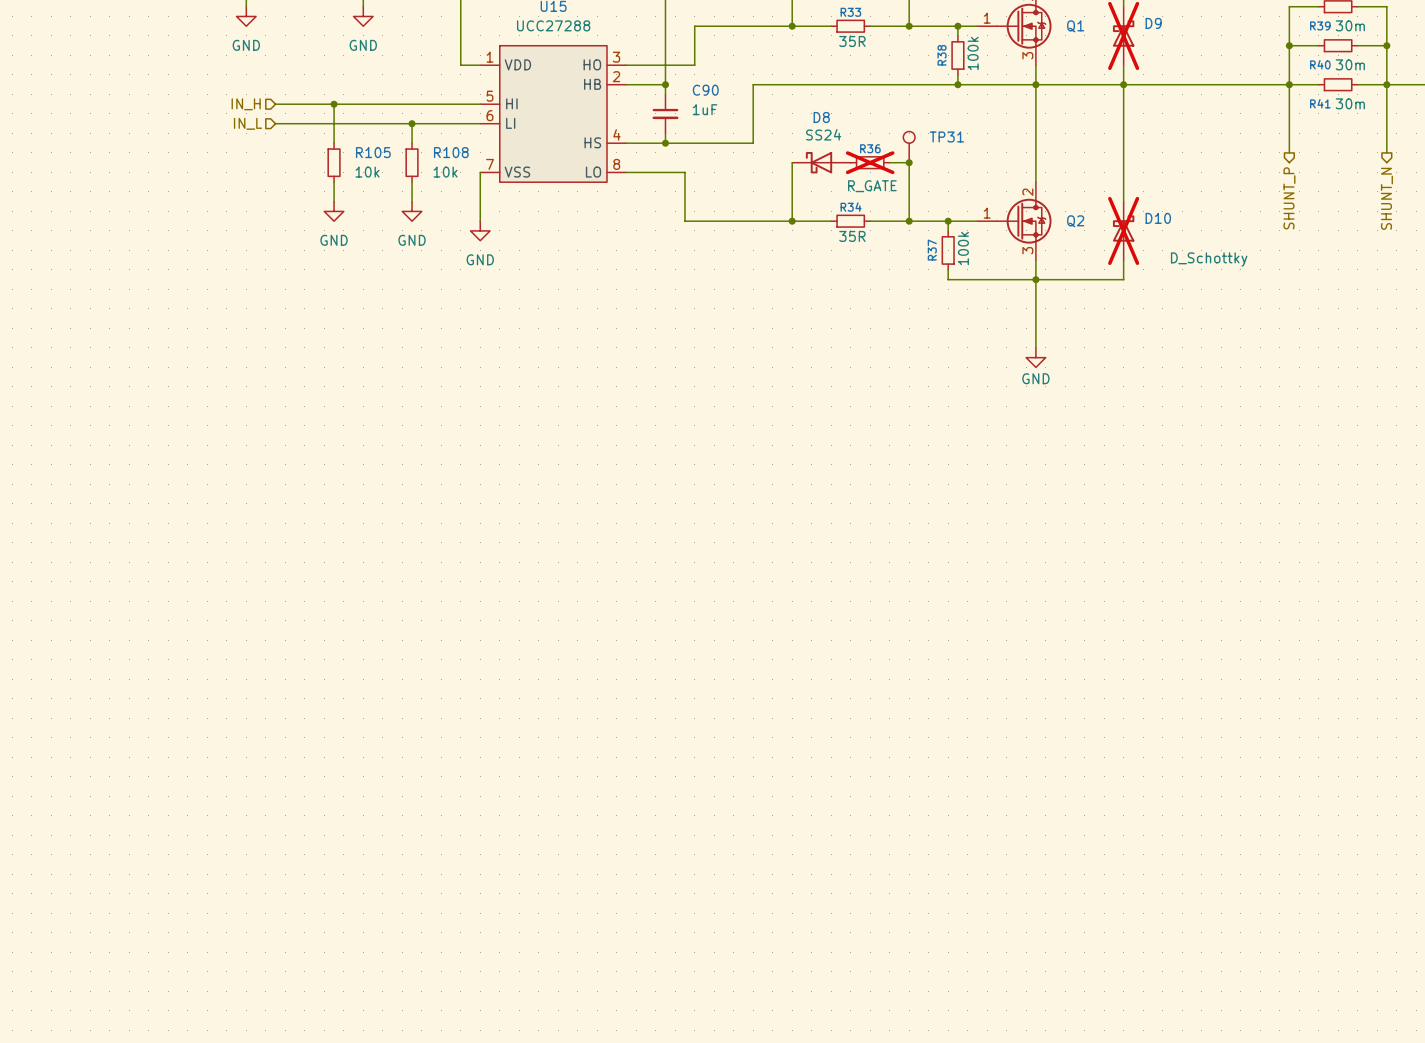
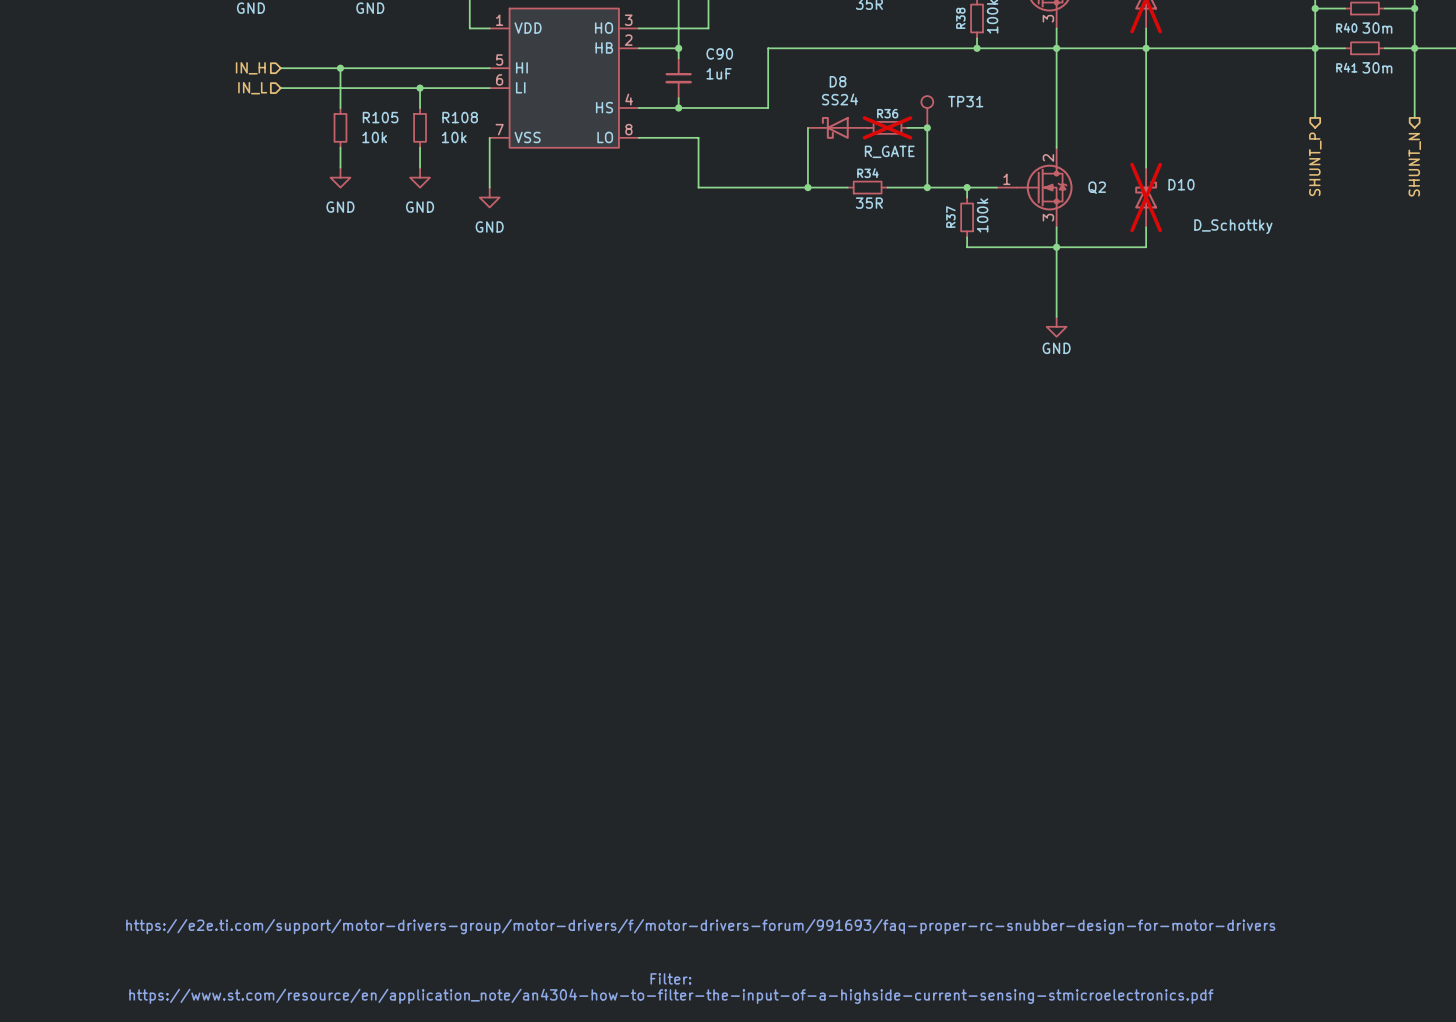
text: none -> https://e2e.ti.com/support/motor-drivers-group/motor-drivers/f/motor-drivers-forum/991693/faq-proper-rc-snubber-design-for-motor-drivers (700, 926)
text: none -> Filter: (670, 978)
text: none -> https://www.st.com/resource/en/application_note/an4304-how-to-filter-the-input-of-a-highside-current-sensing-stmicroelectronics.pdf (671, 996)

